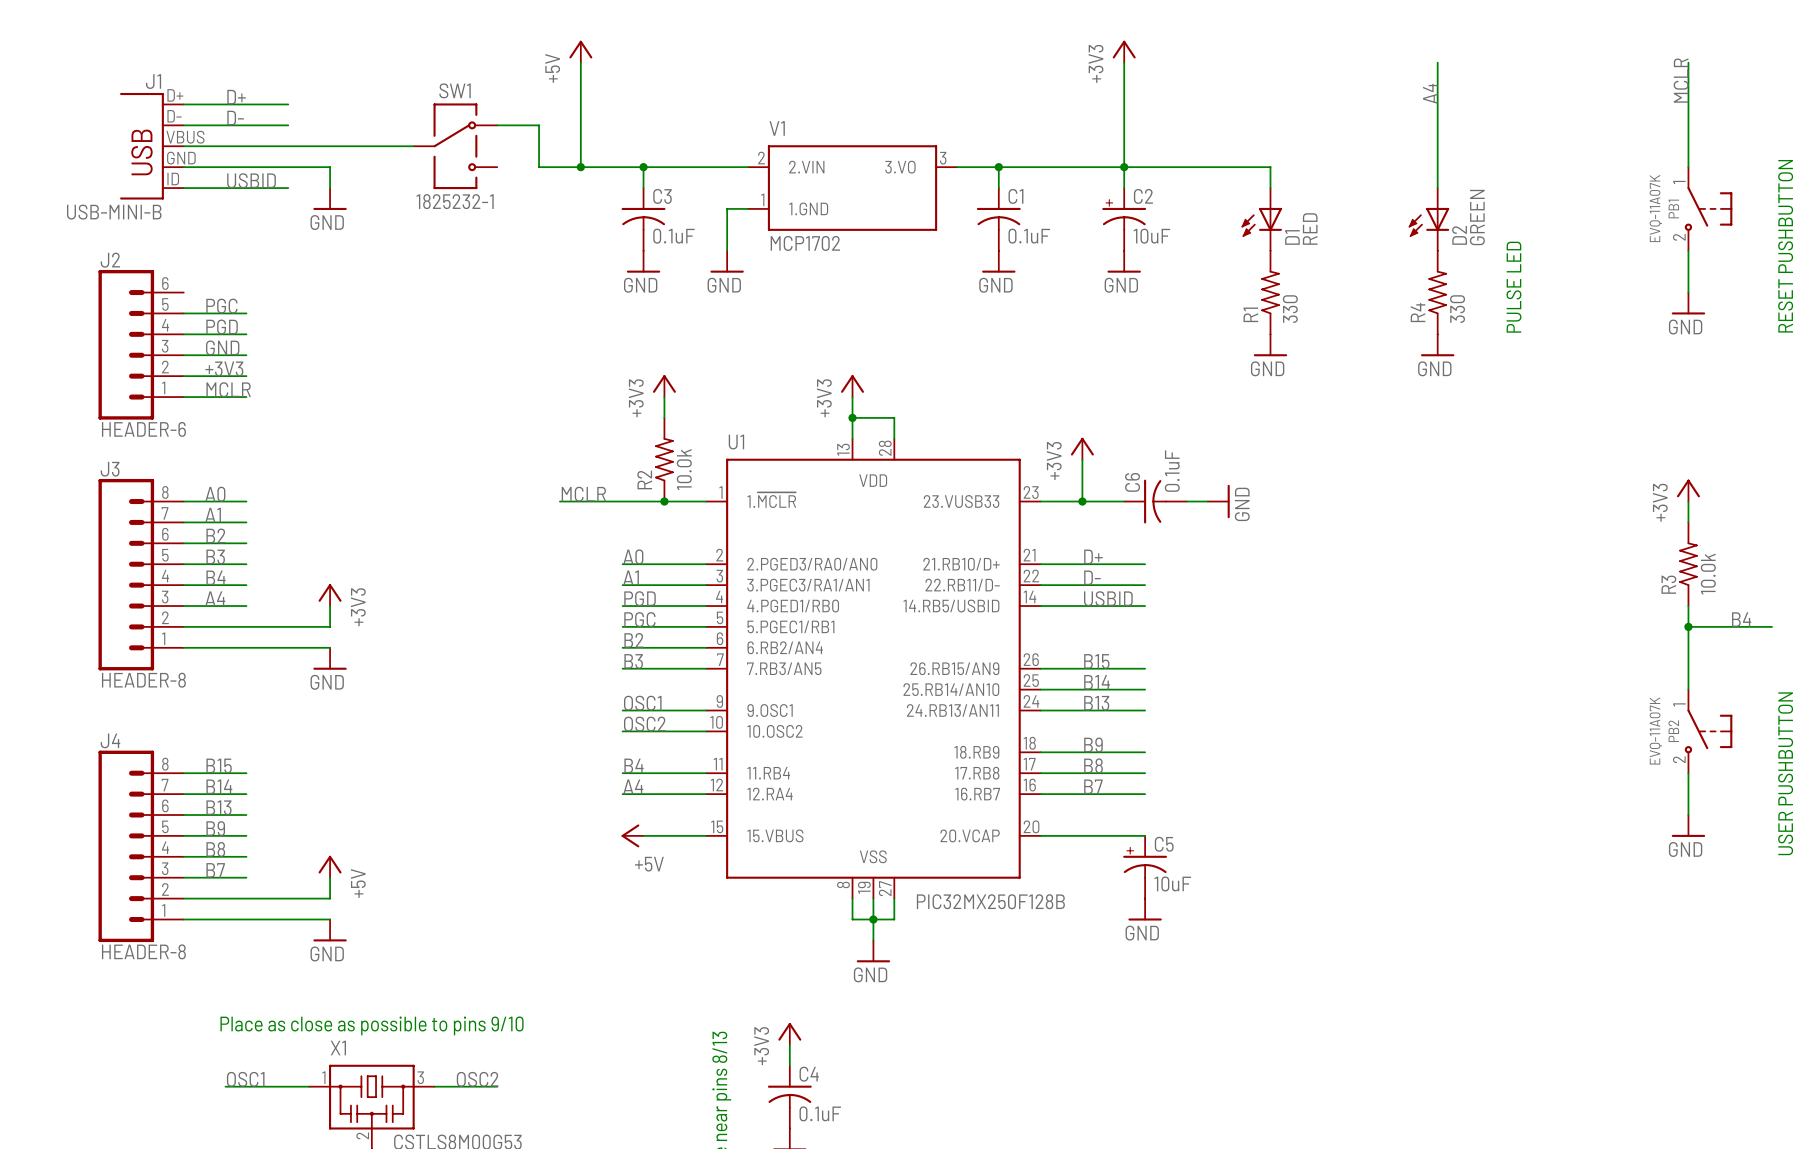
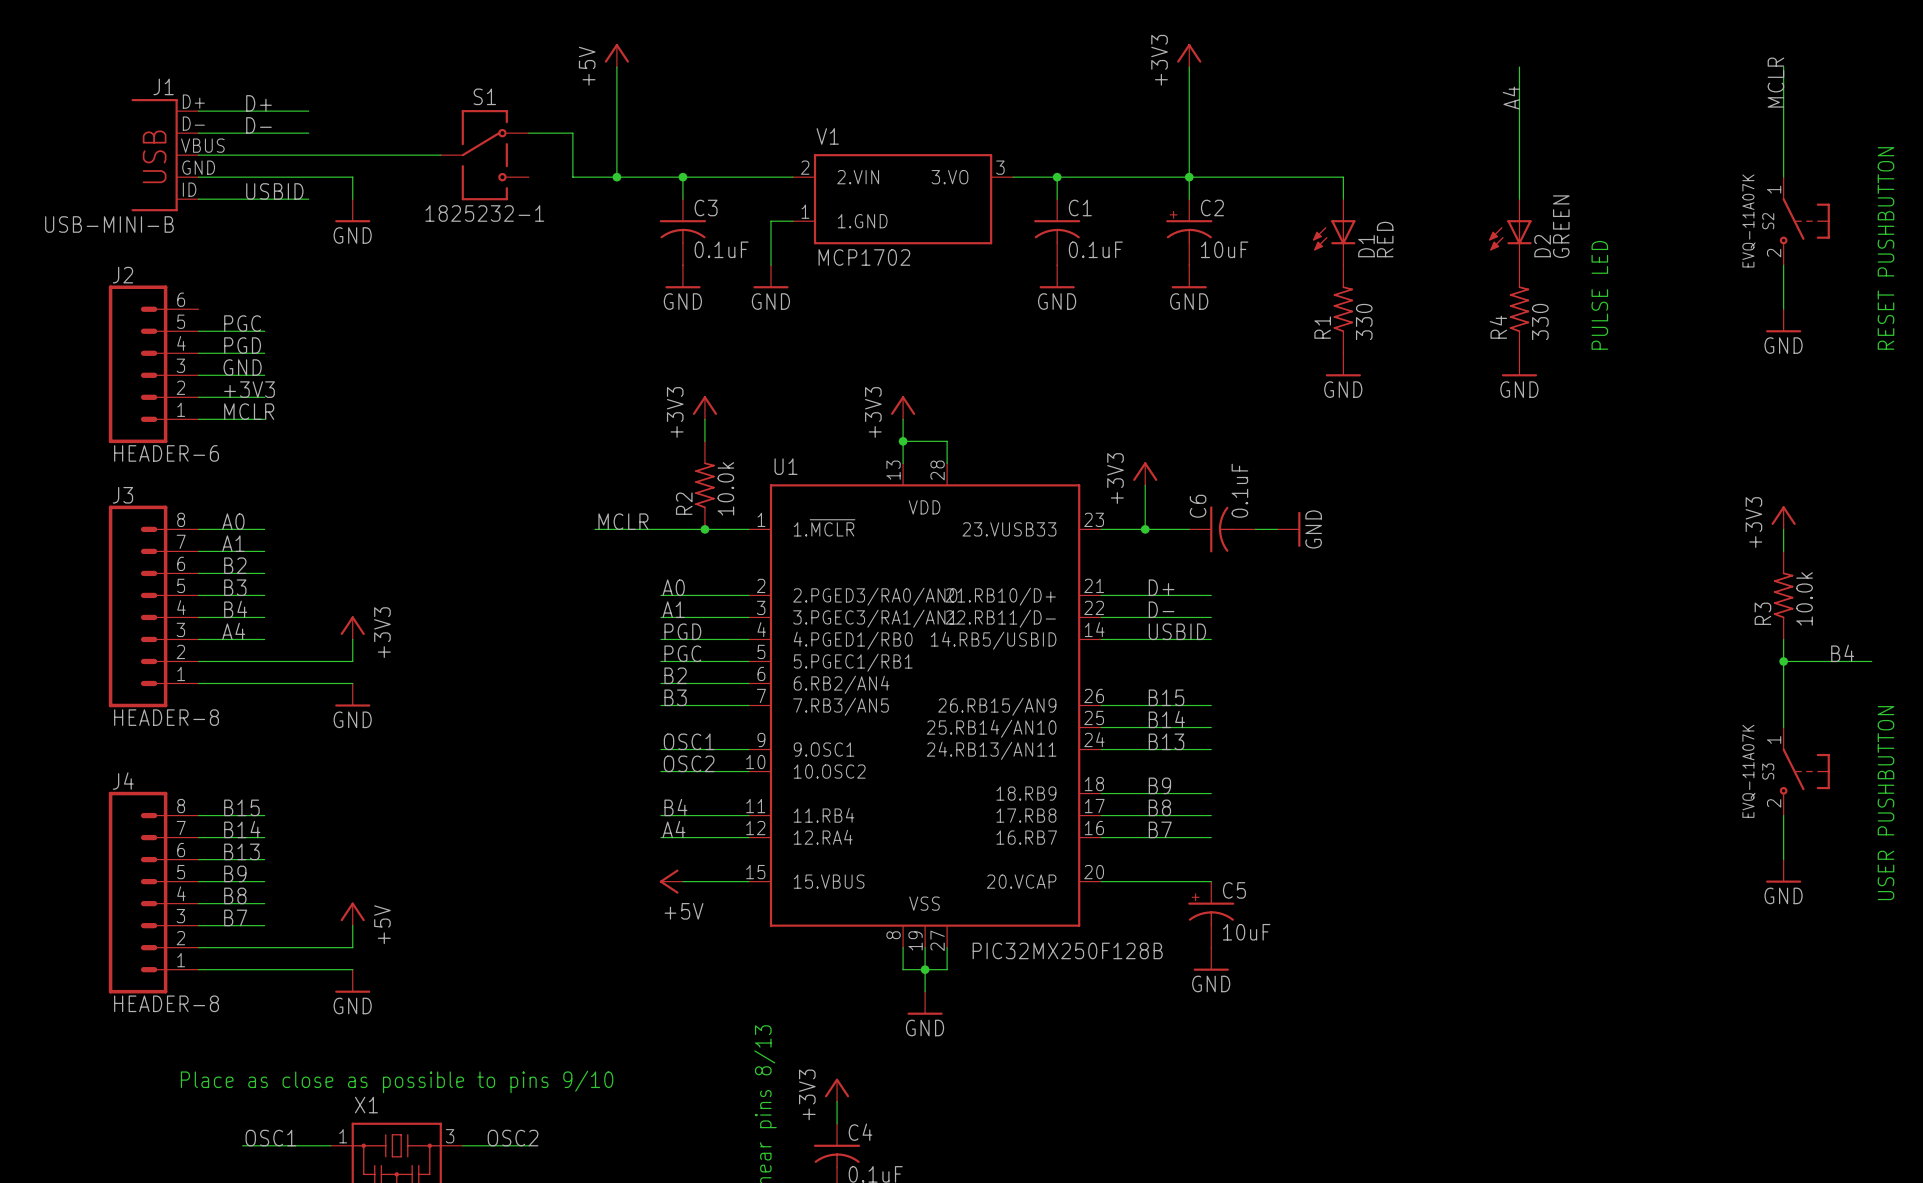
SW1 name: SW1 (455, 90) -> S1 (484, 96)
PB1 name: PB1 (1673, 208) -> S2 (1768, 221)
PB2 name: PB2 (1673, 731) -> S3 (1768, 771)

